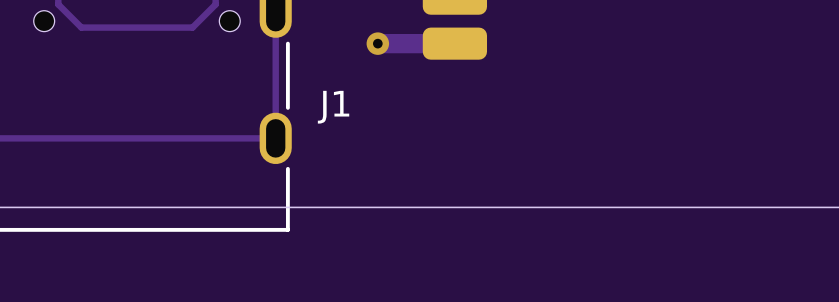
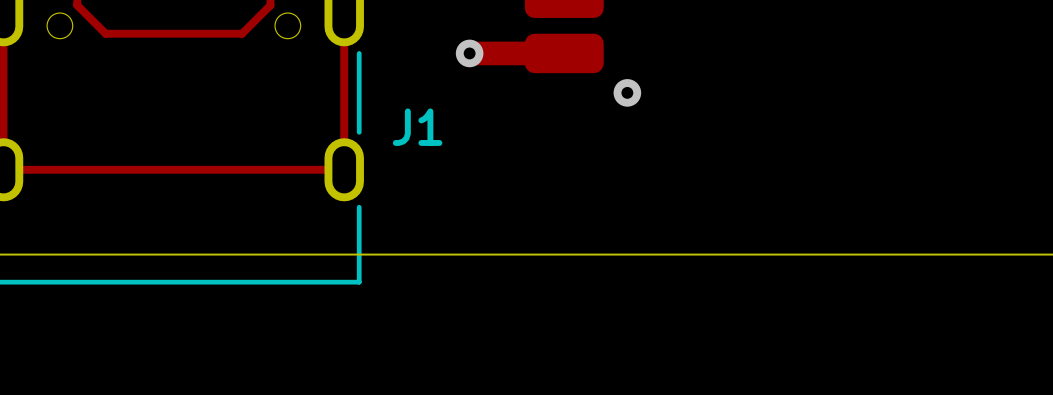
via: none -> (627, 92)

